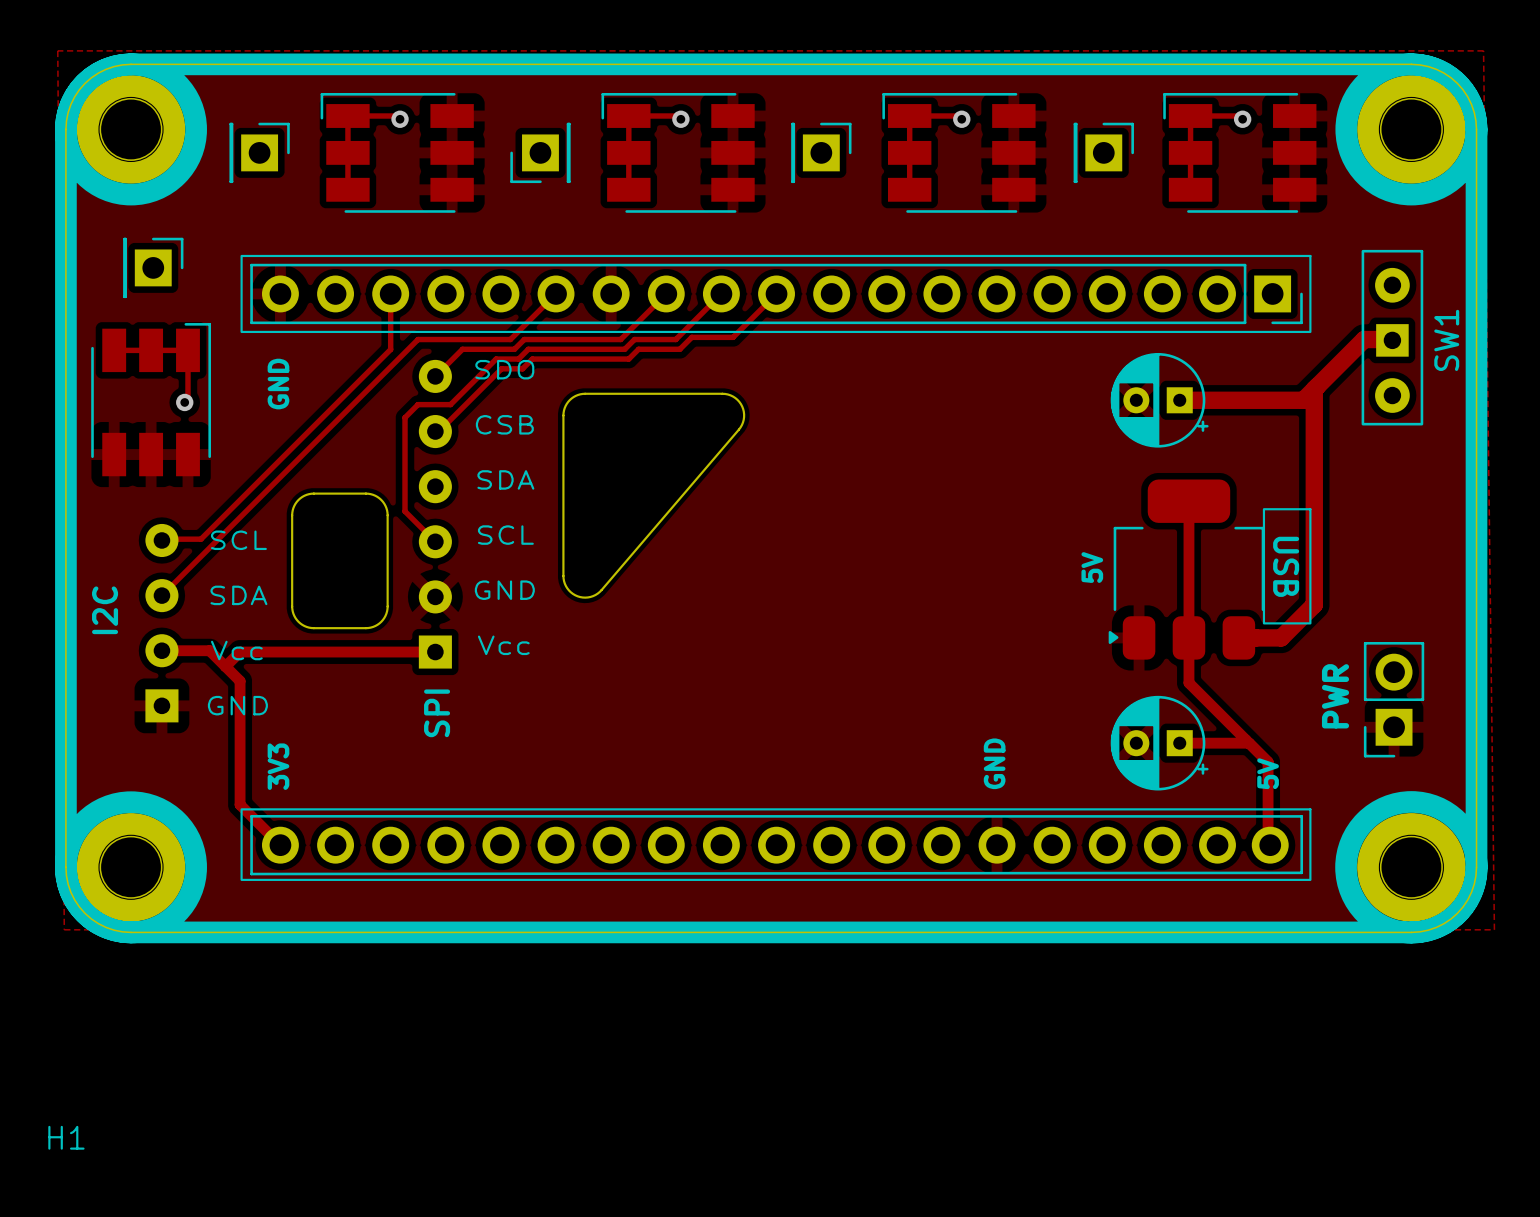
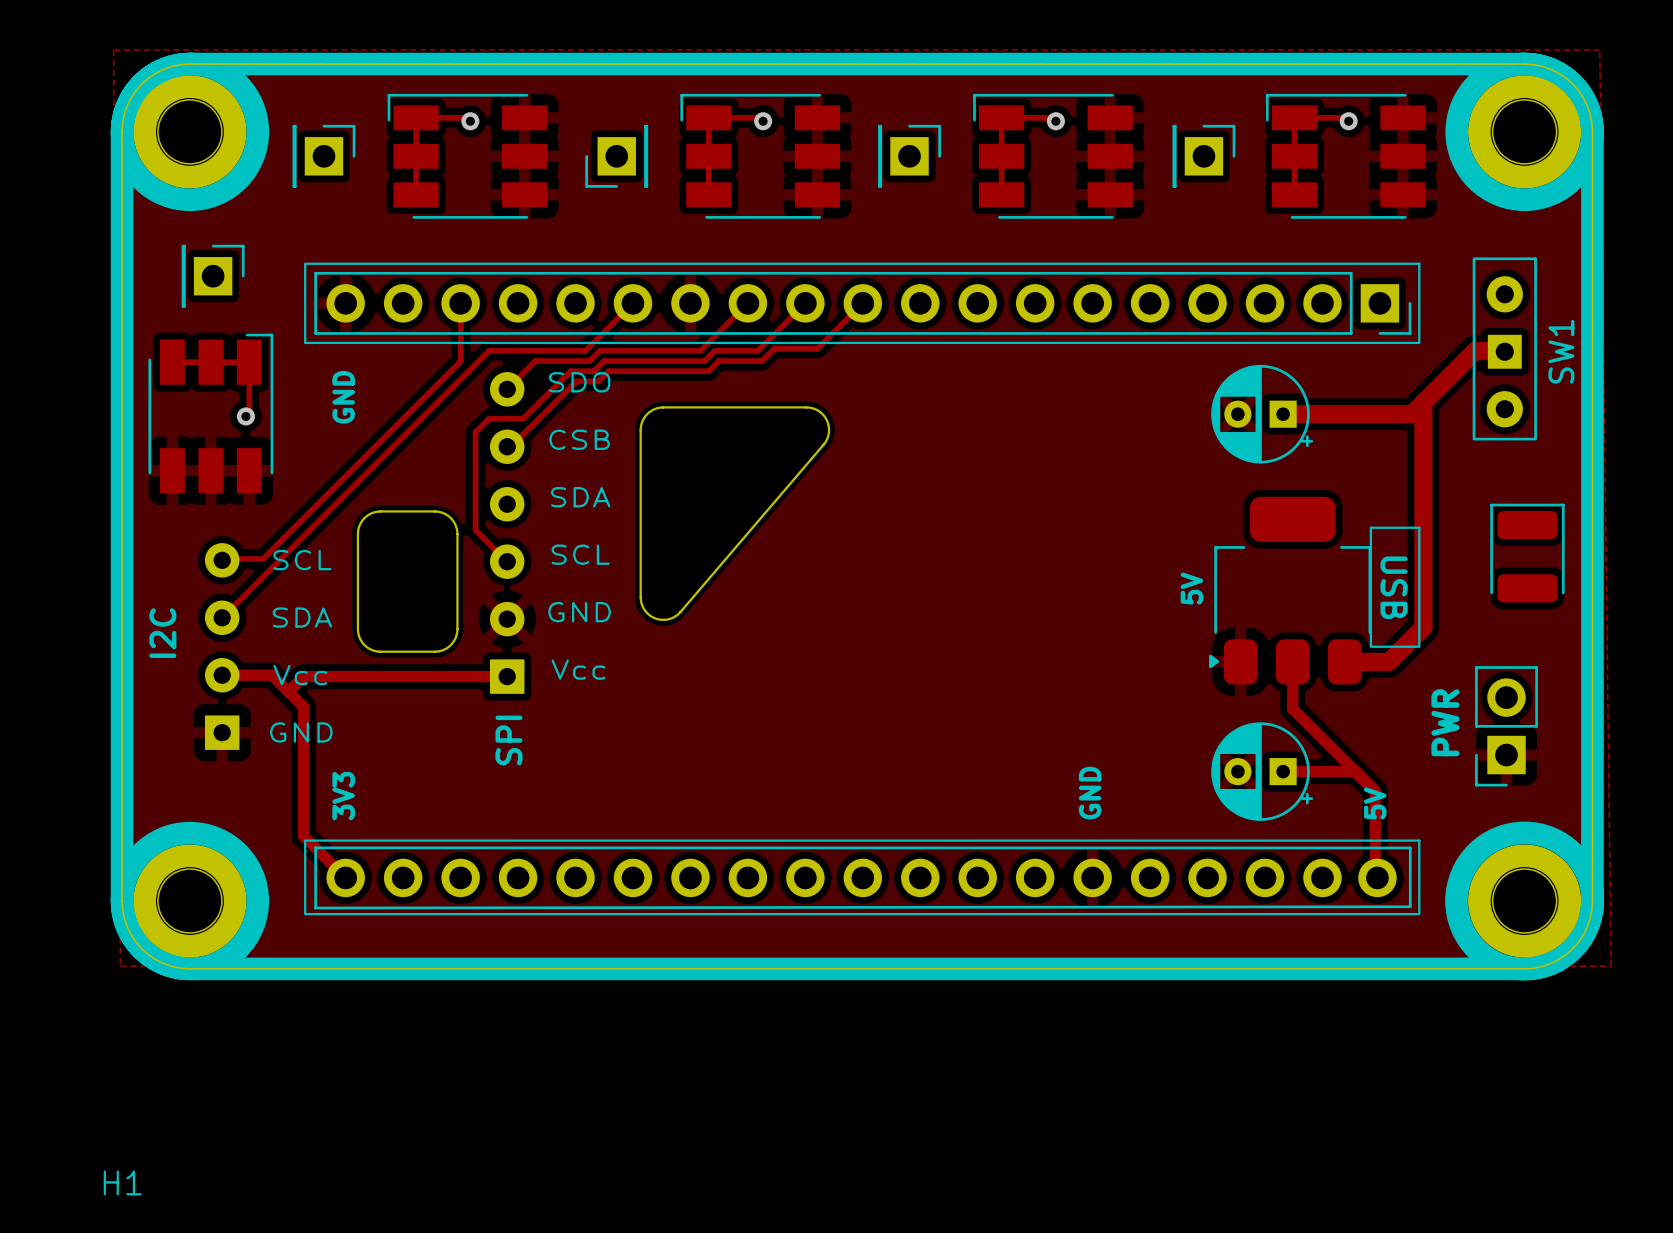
track: (1188, 501) (1188, 637) -> none
part: none -> (1527, 553)

